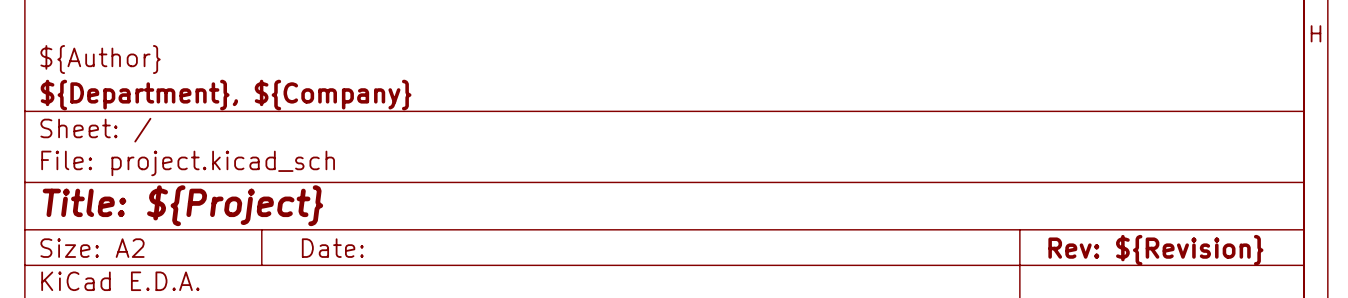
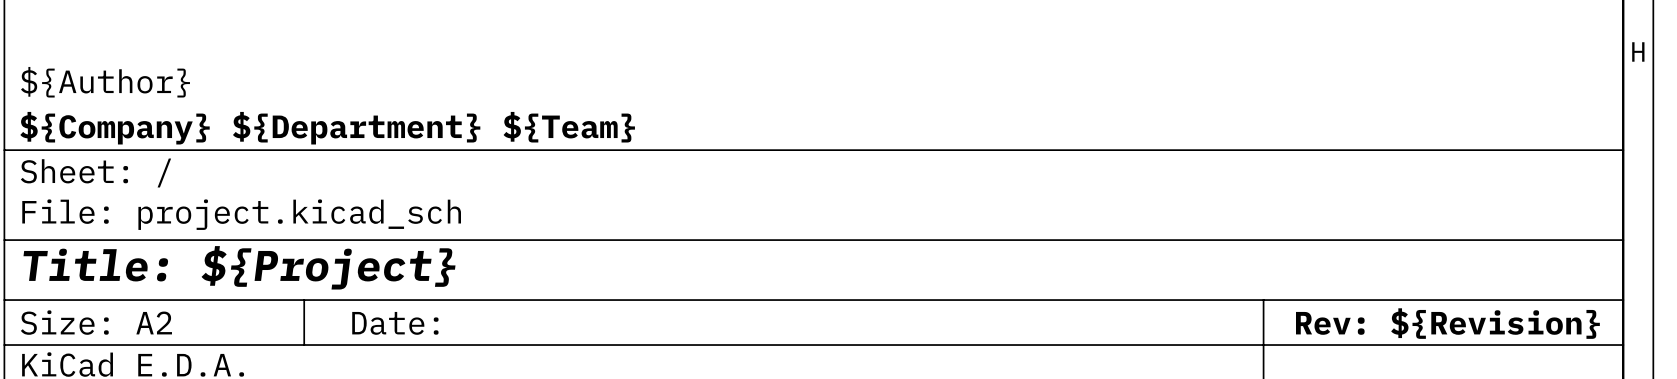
title block: ${Department}, ${Company} (226, 95) -> ${Company} ${Department} ${Team} (327, 128)

